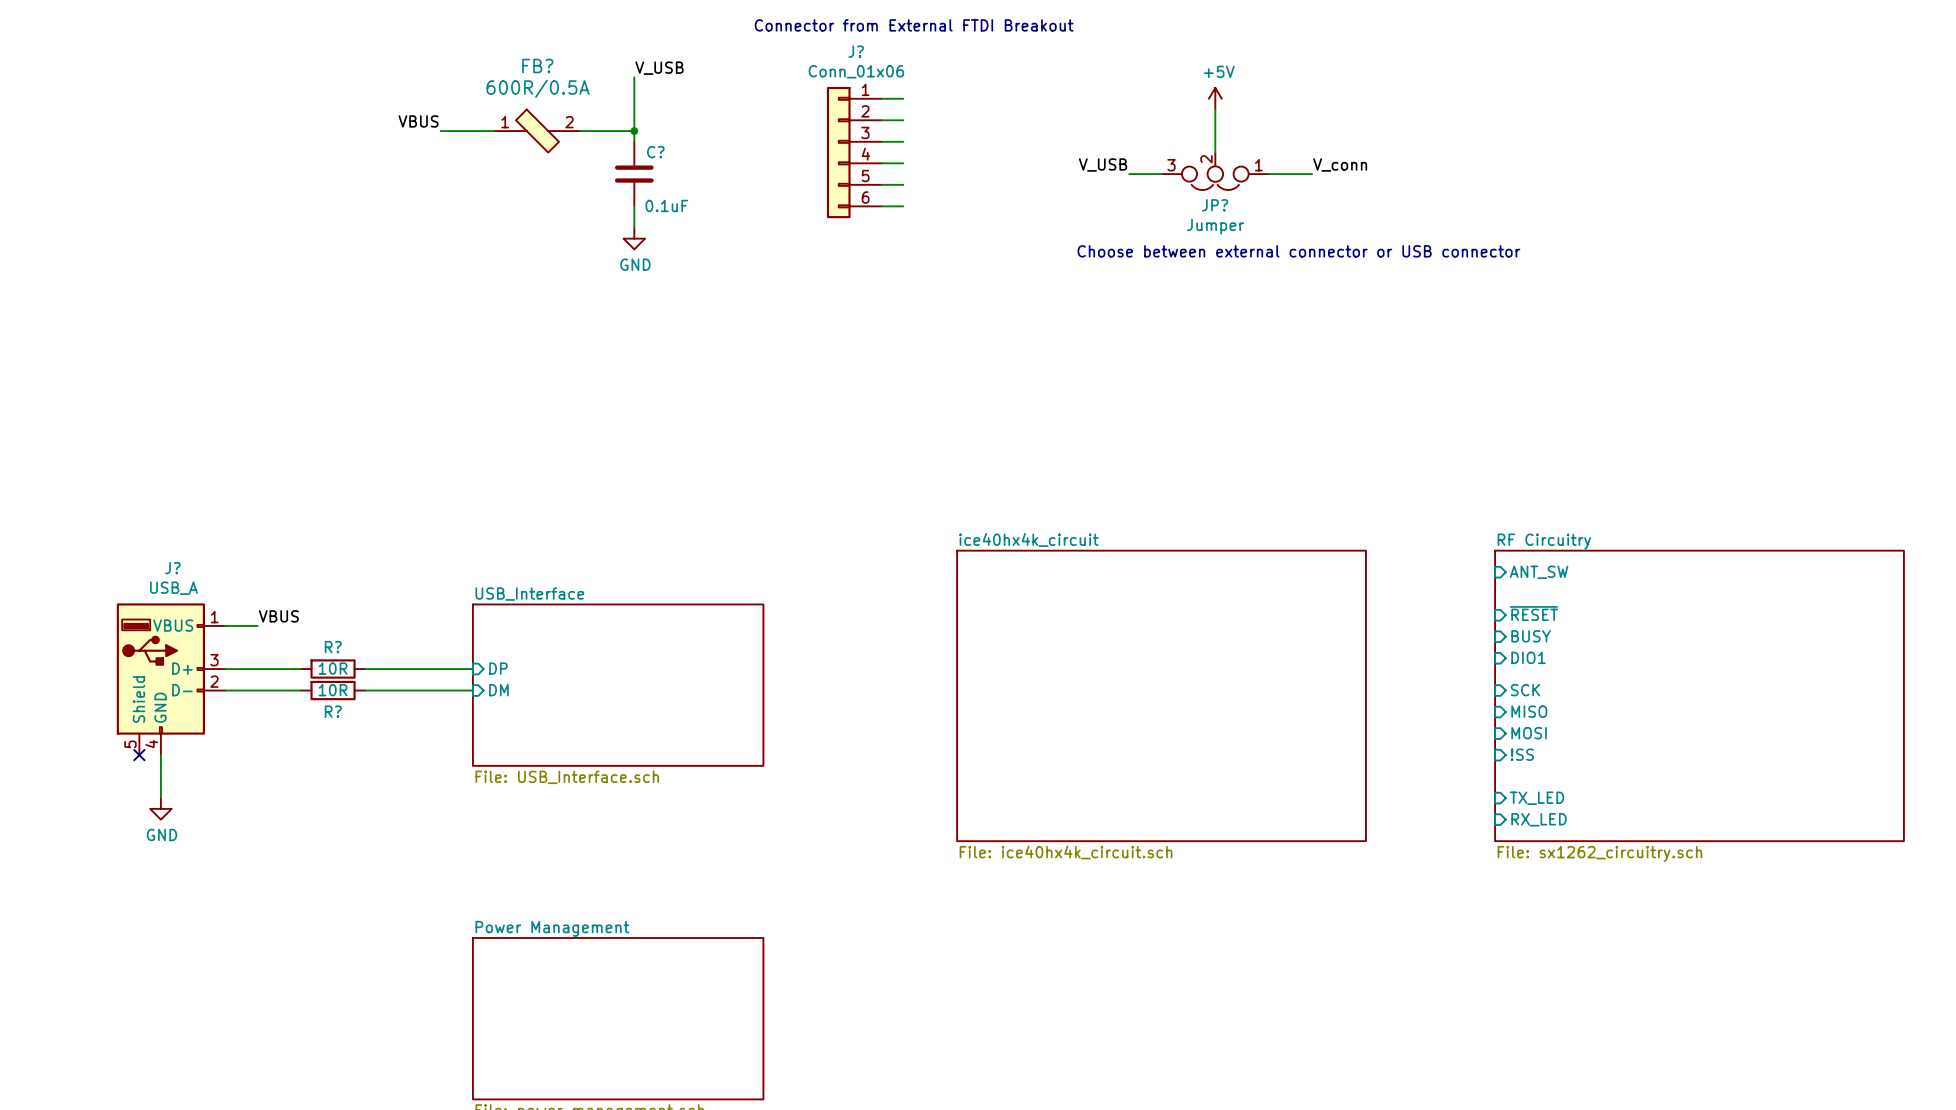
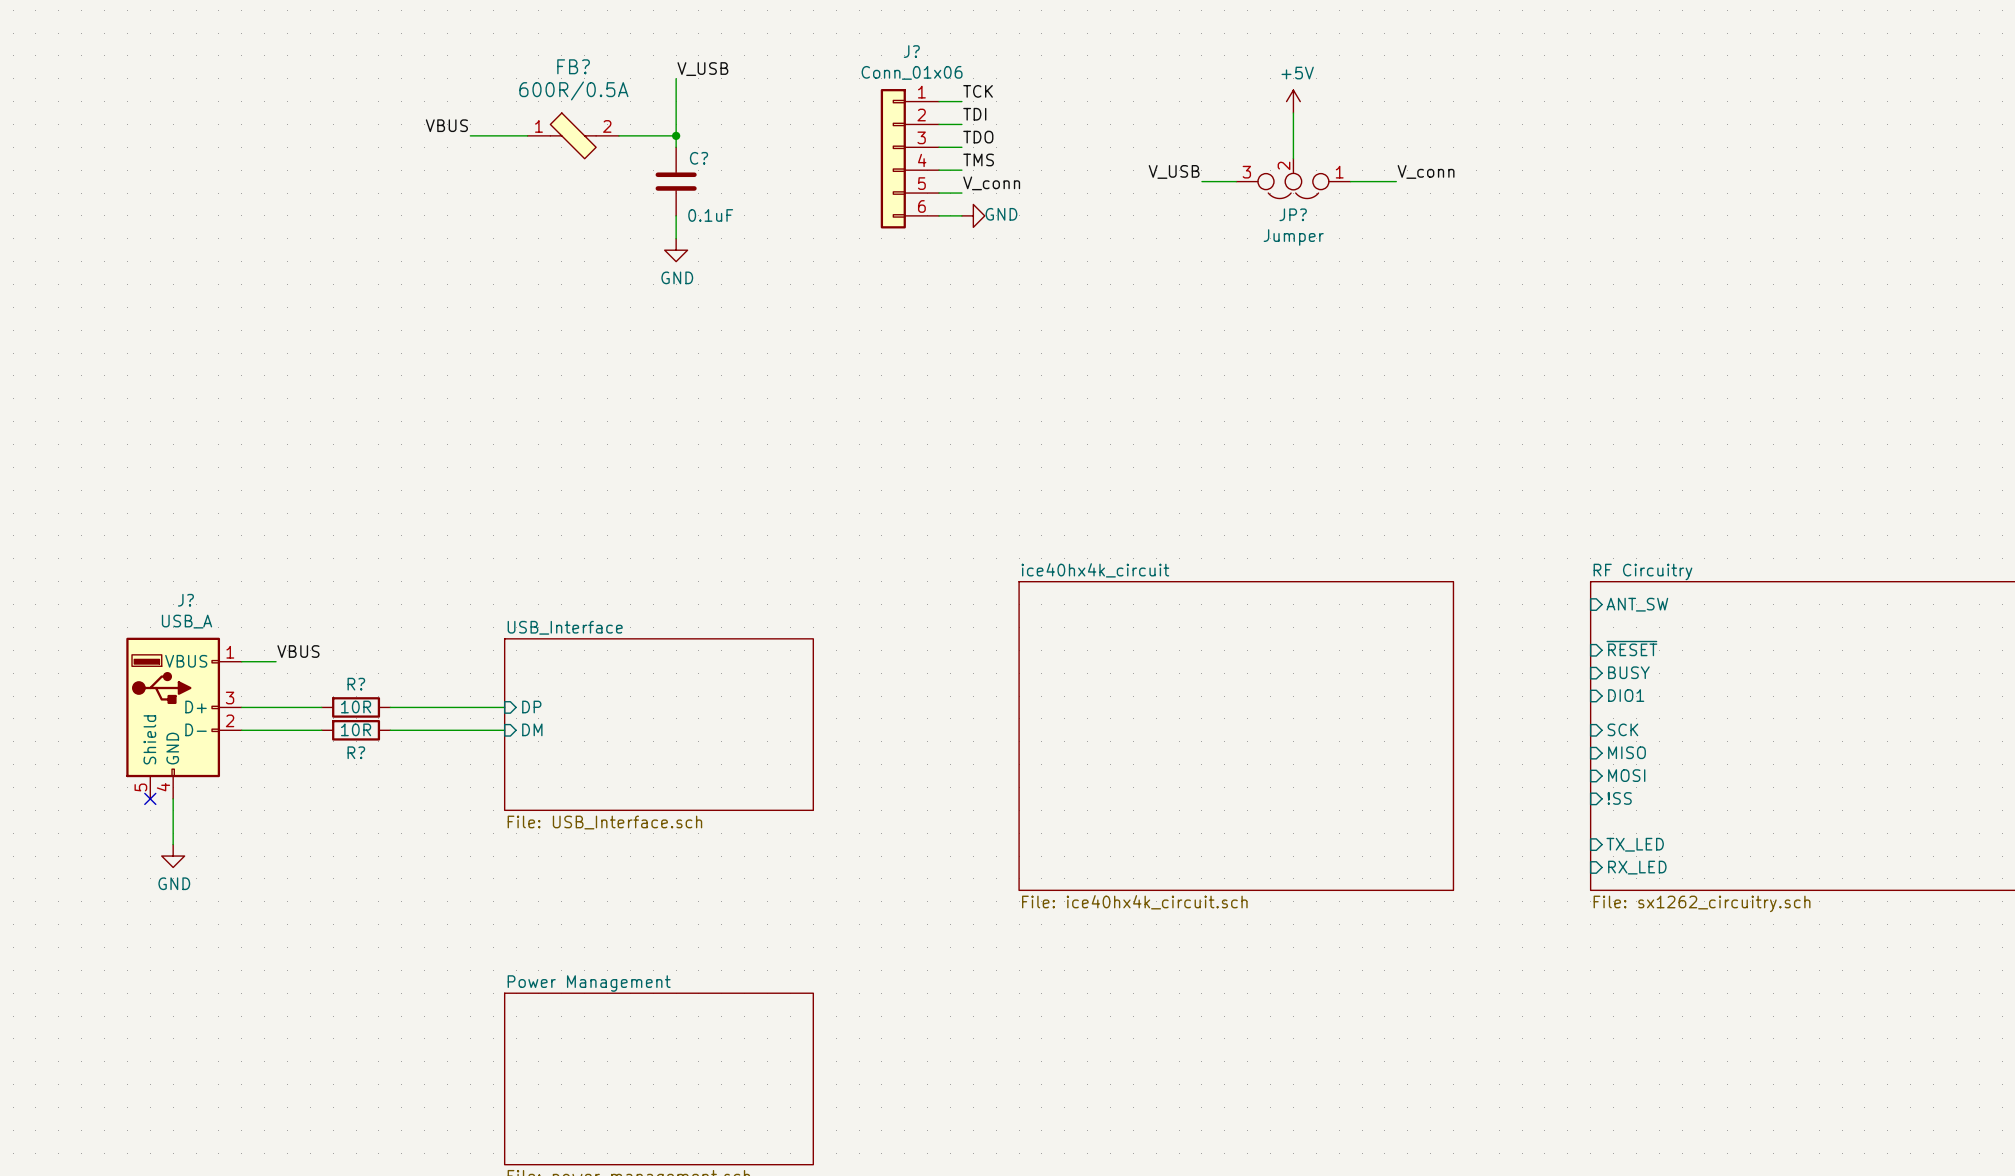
text: Connector from External FTDI Breakout (914, 25) -> none
label: none -> TCK (978, 91)
label: none -> TDI (974, 114)
label: none -> TDO (978, 137)
label: none -> TMS (978, 159)
label: none -> V_conn (991, 183)
power symbol: none -> GND (973, 215)
text: Choose between external connector or USB connector (1298, 251) -> none

